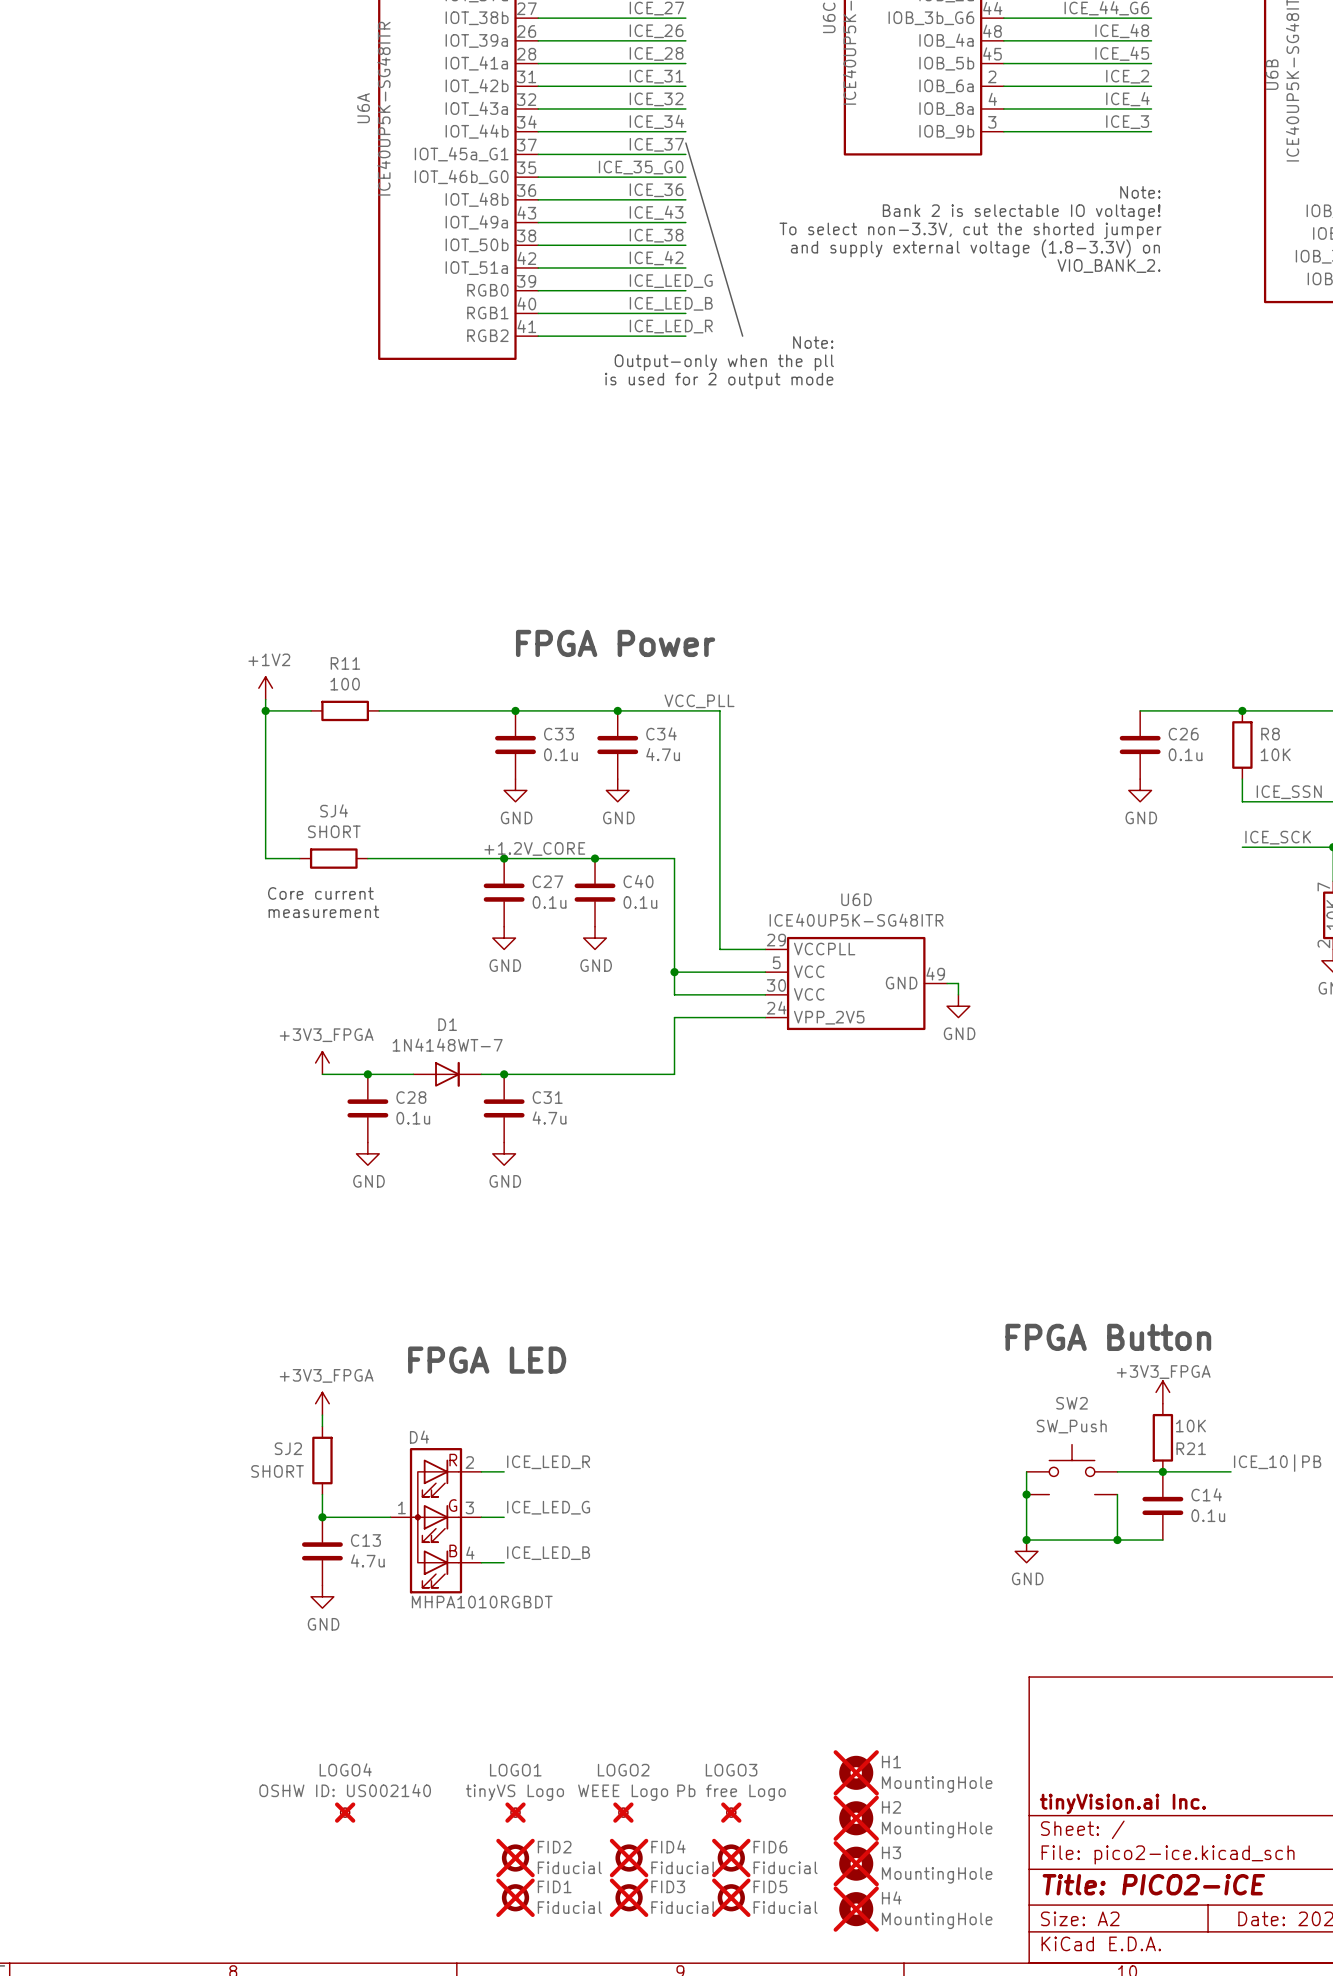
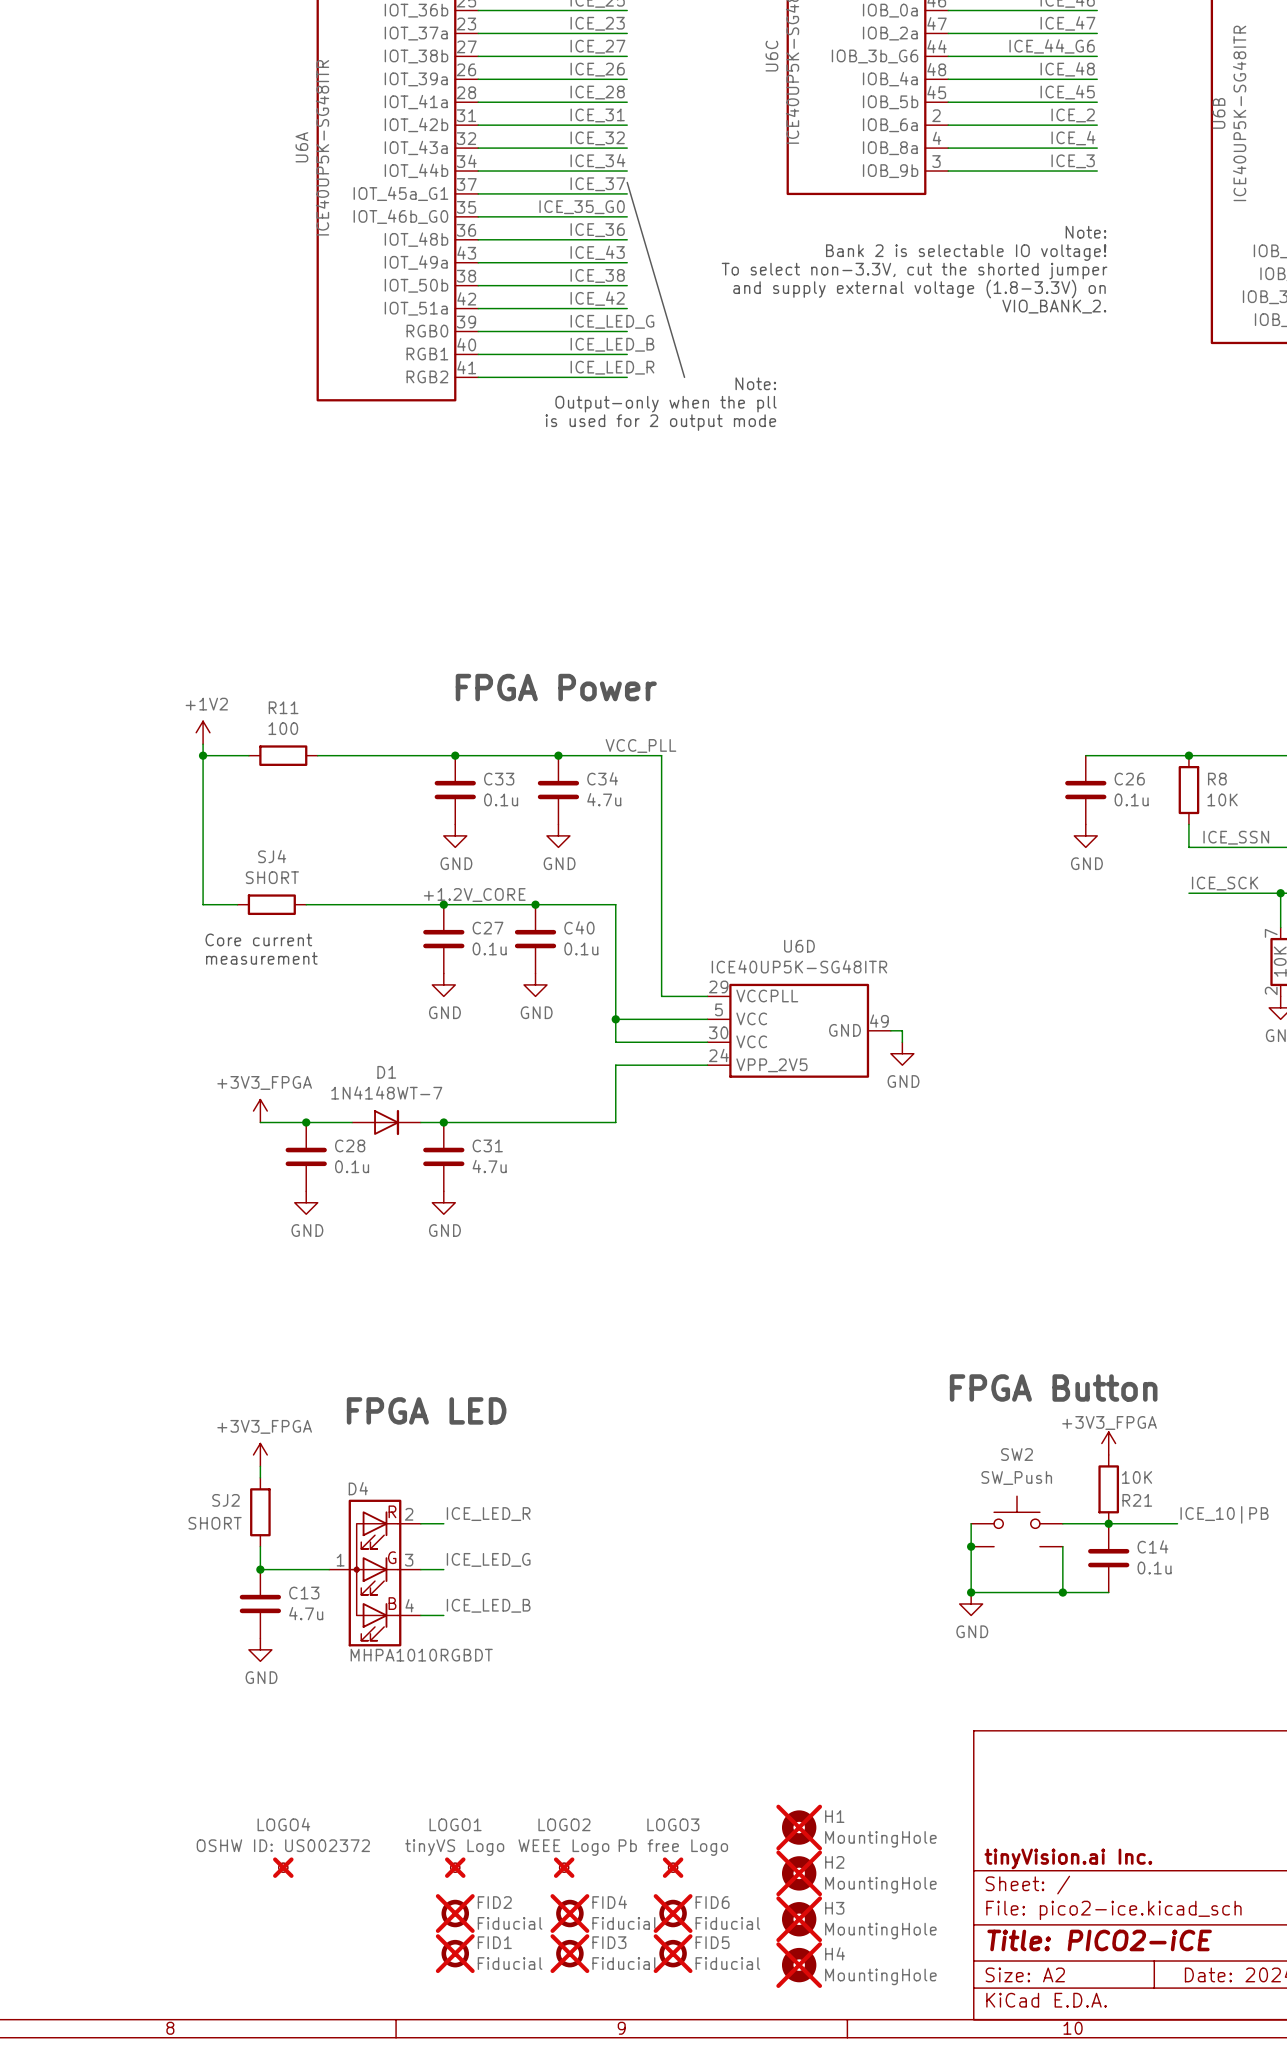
LOGO4 value: OSHW ID: US002140 (345, 1790) -> OSHW ID: US002372 (283, 1845)

